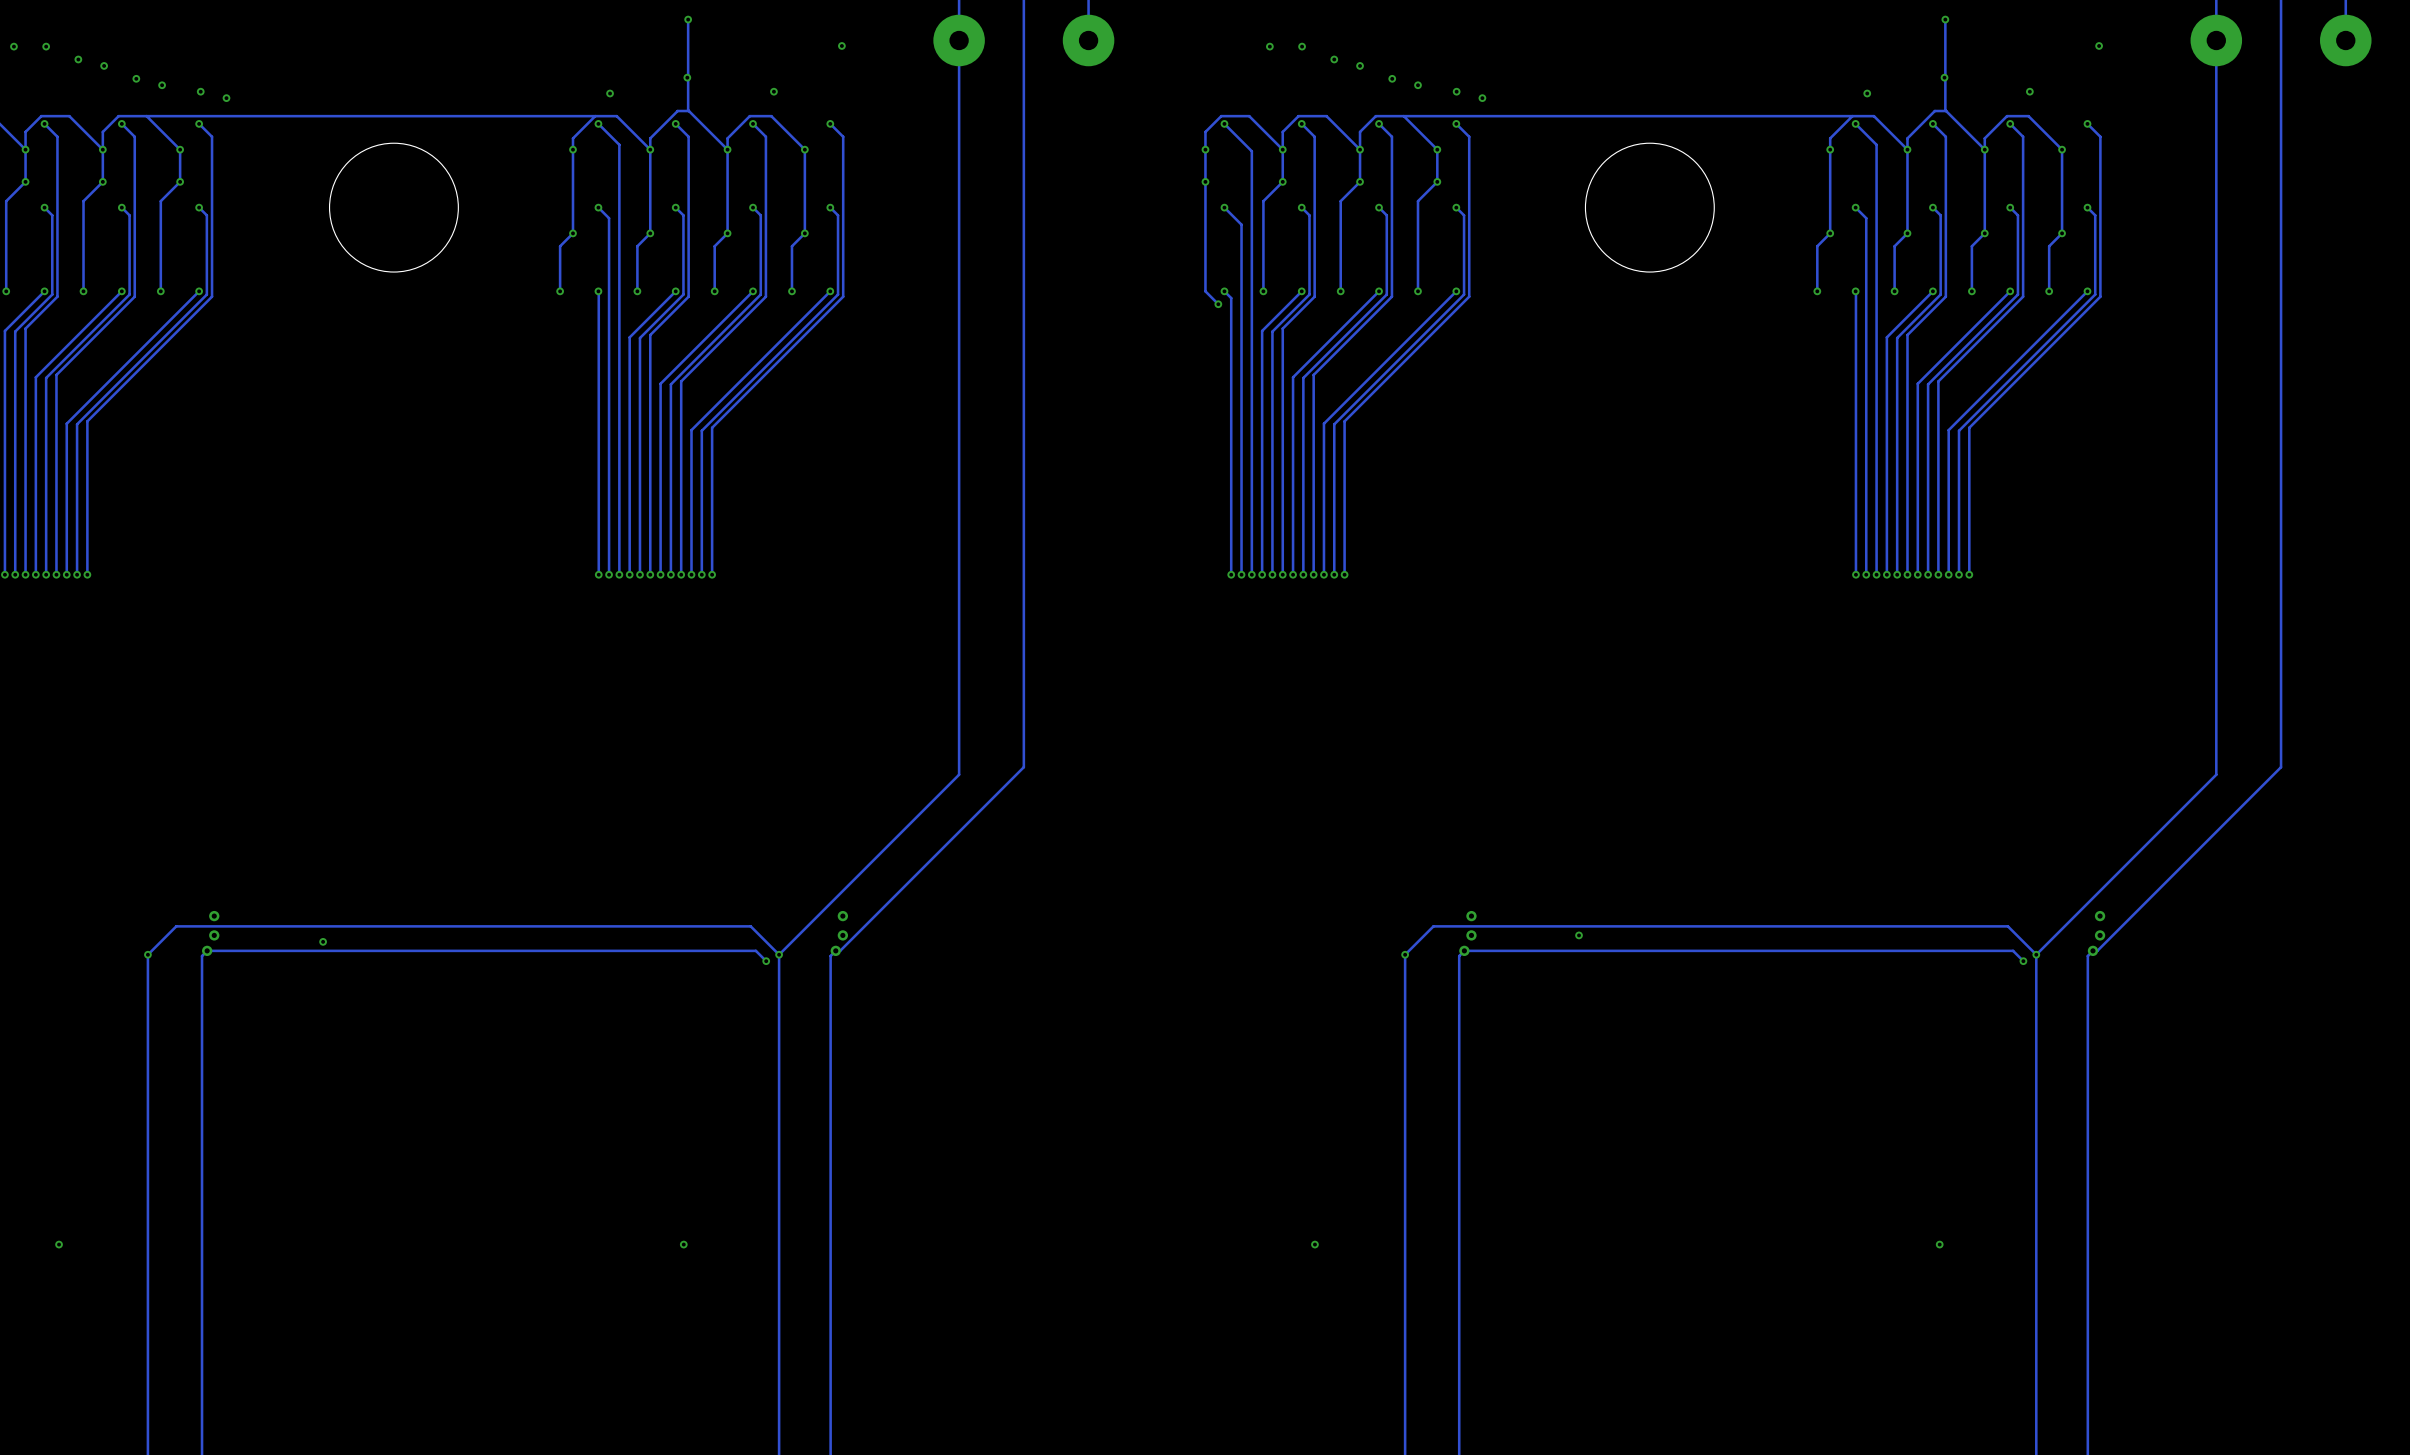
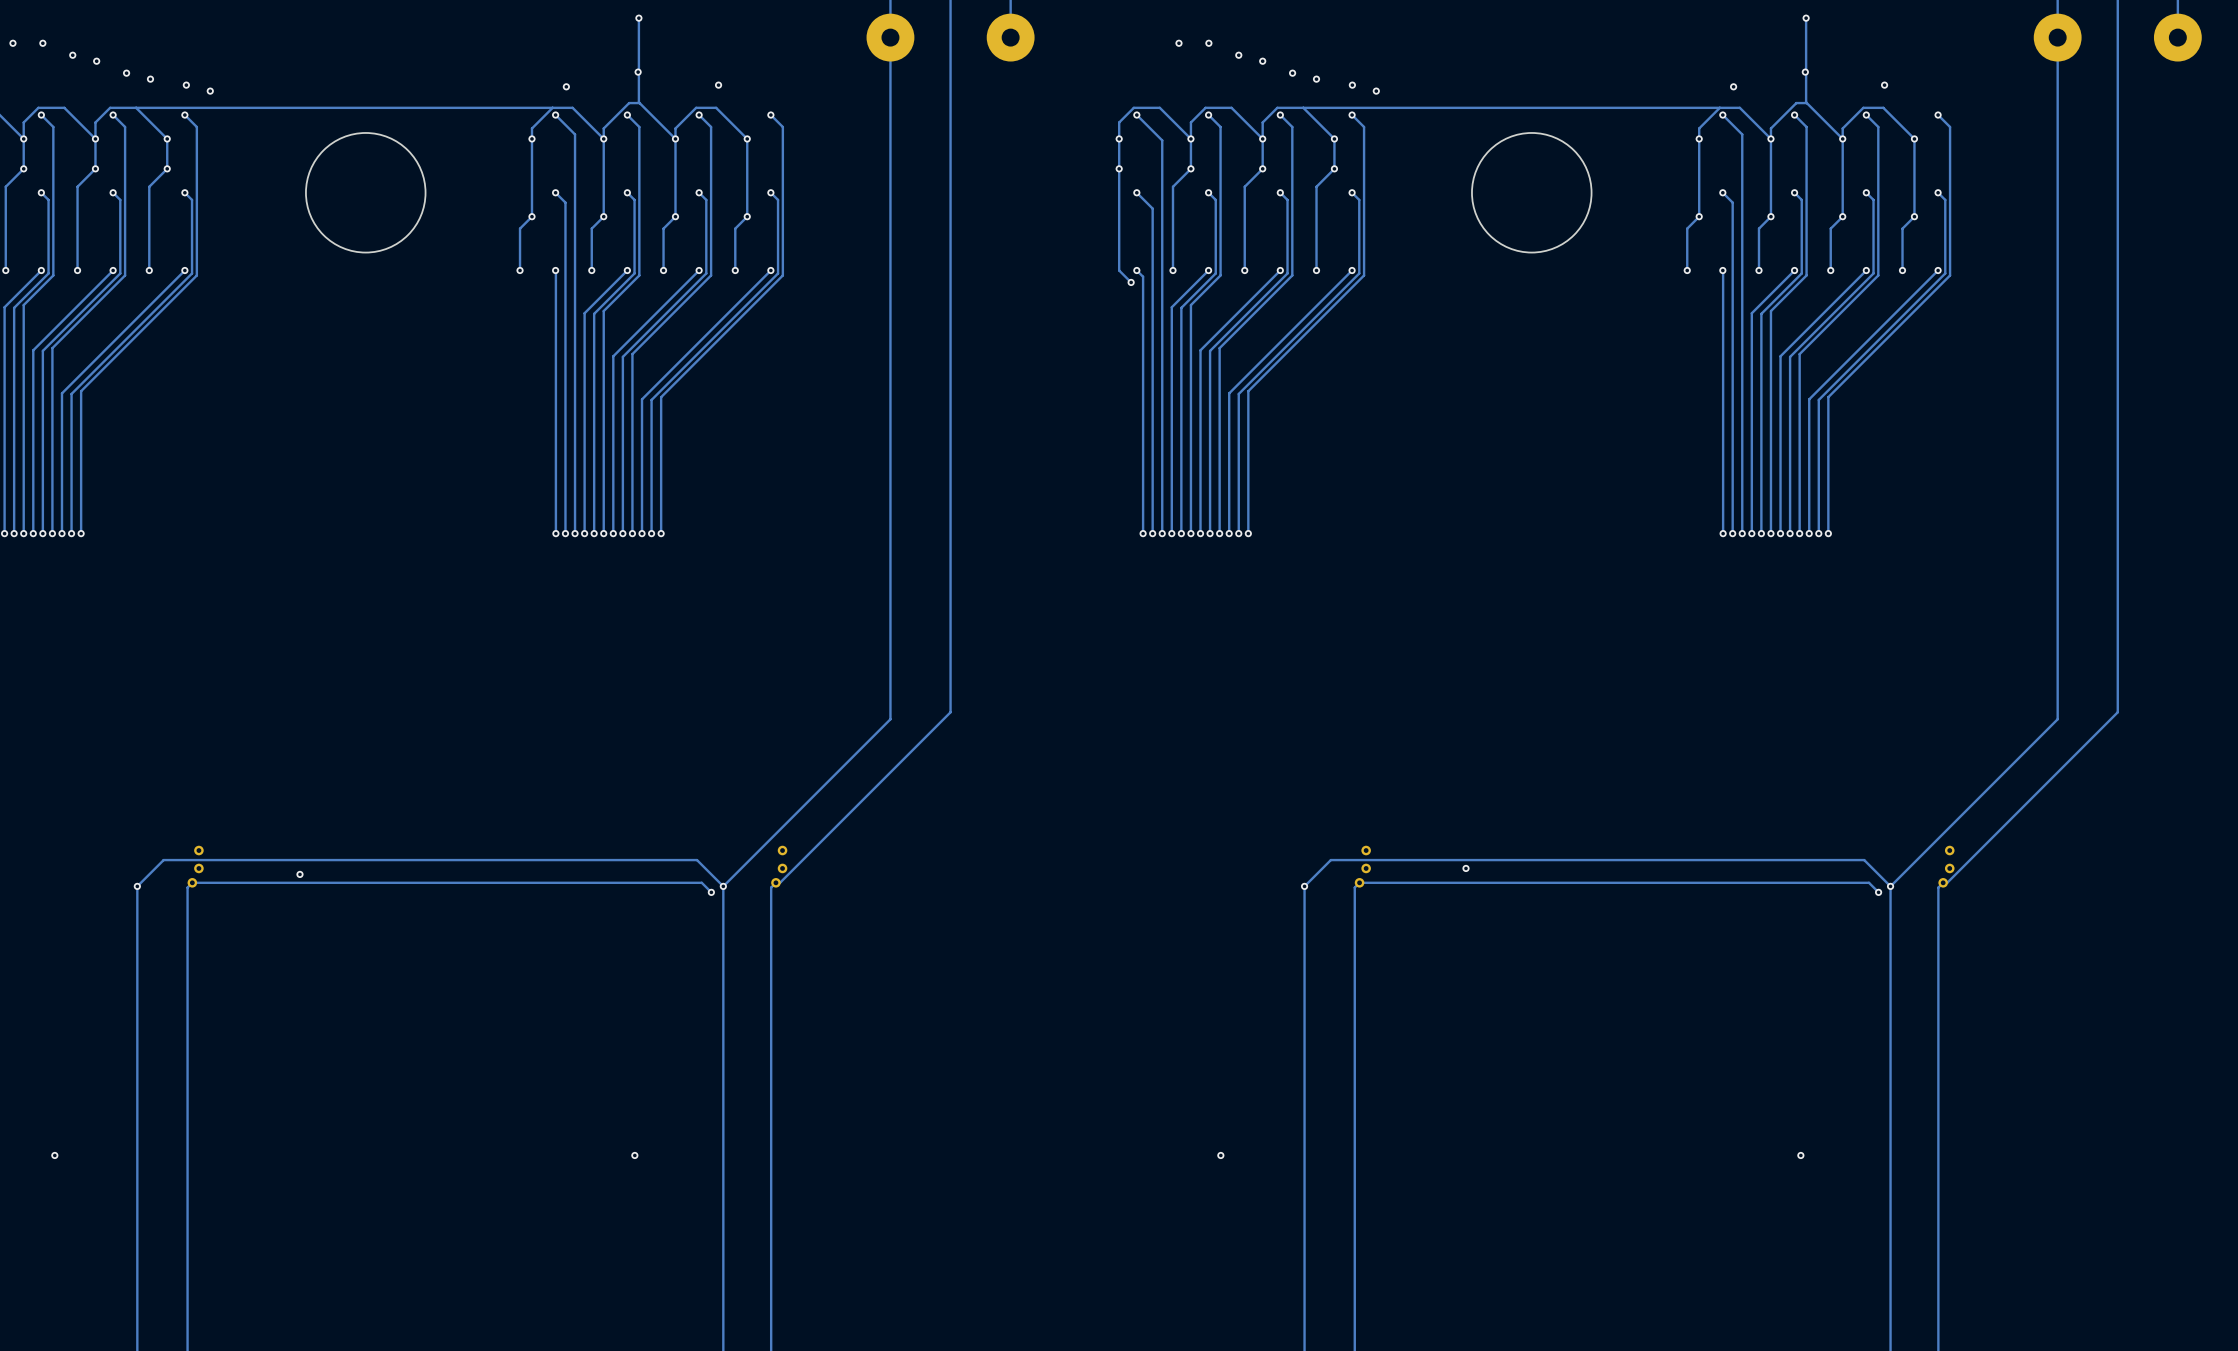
via: (841, 45) -> none
via: (2099, 45) -> none

